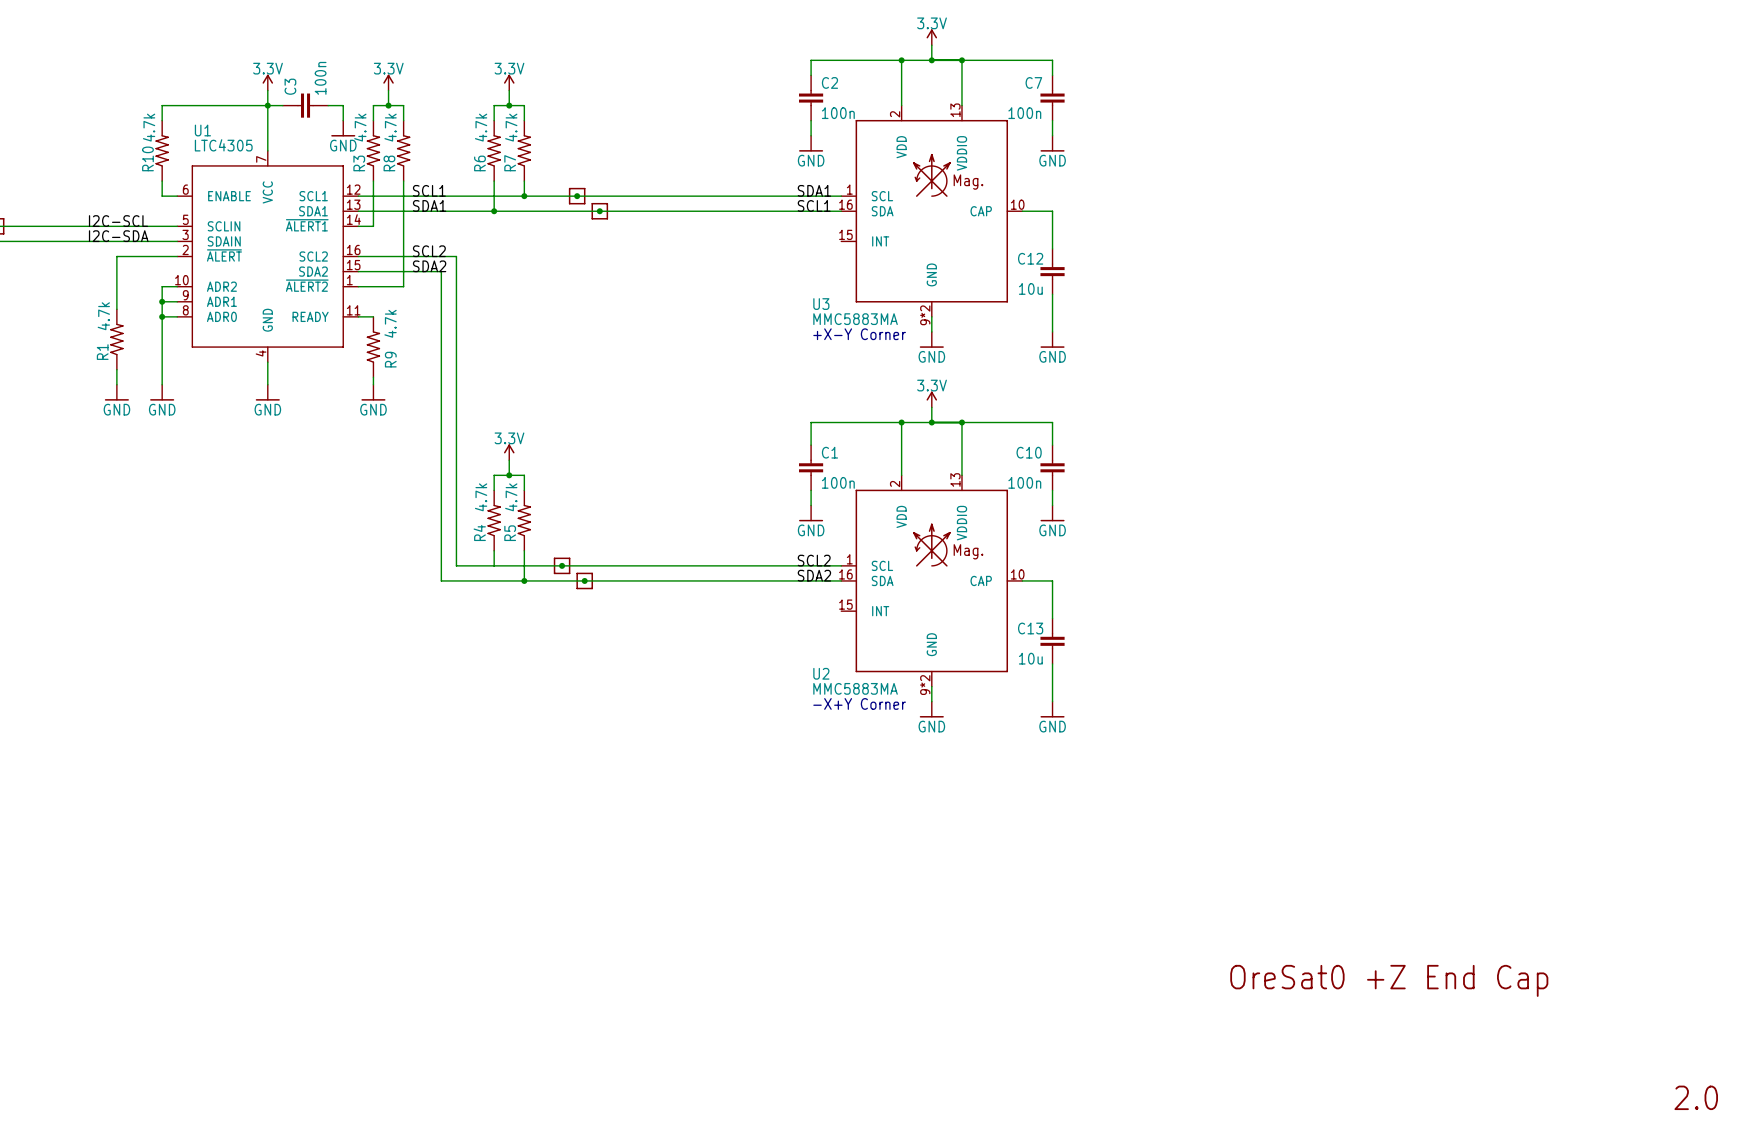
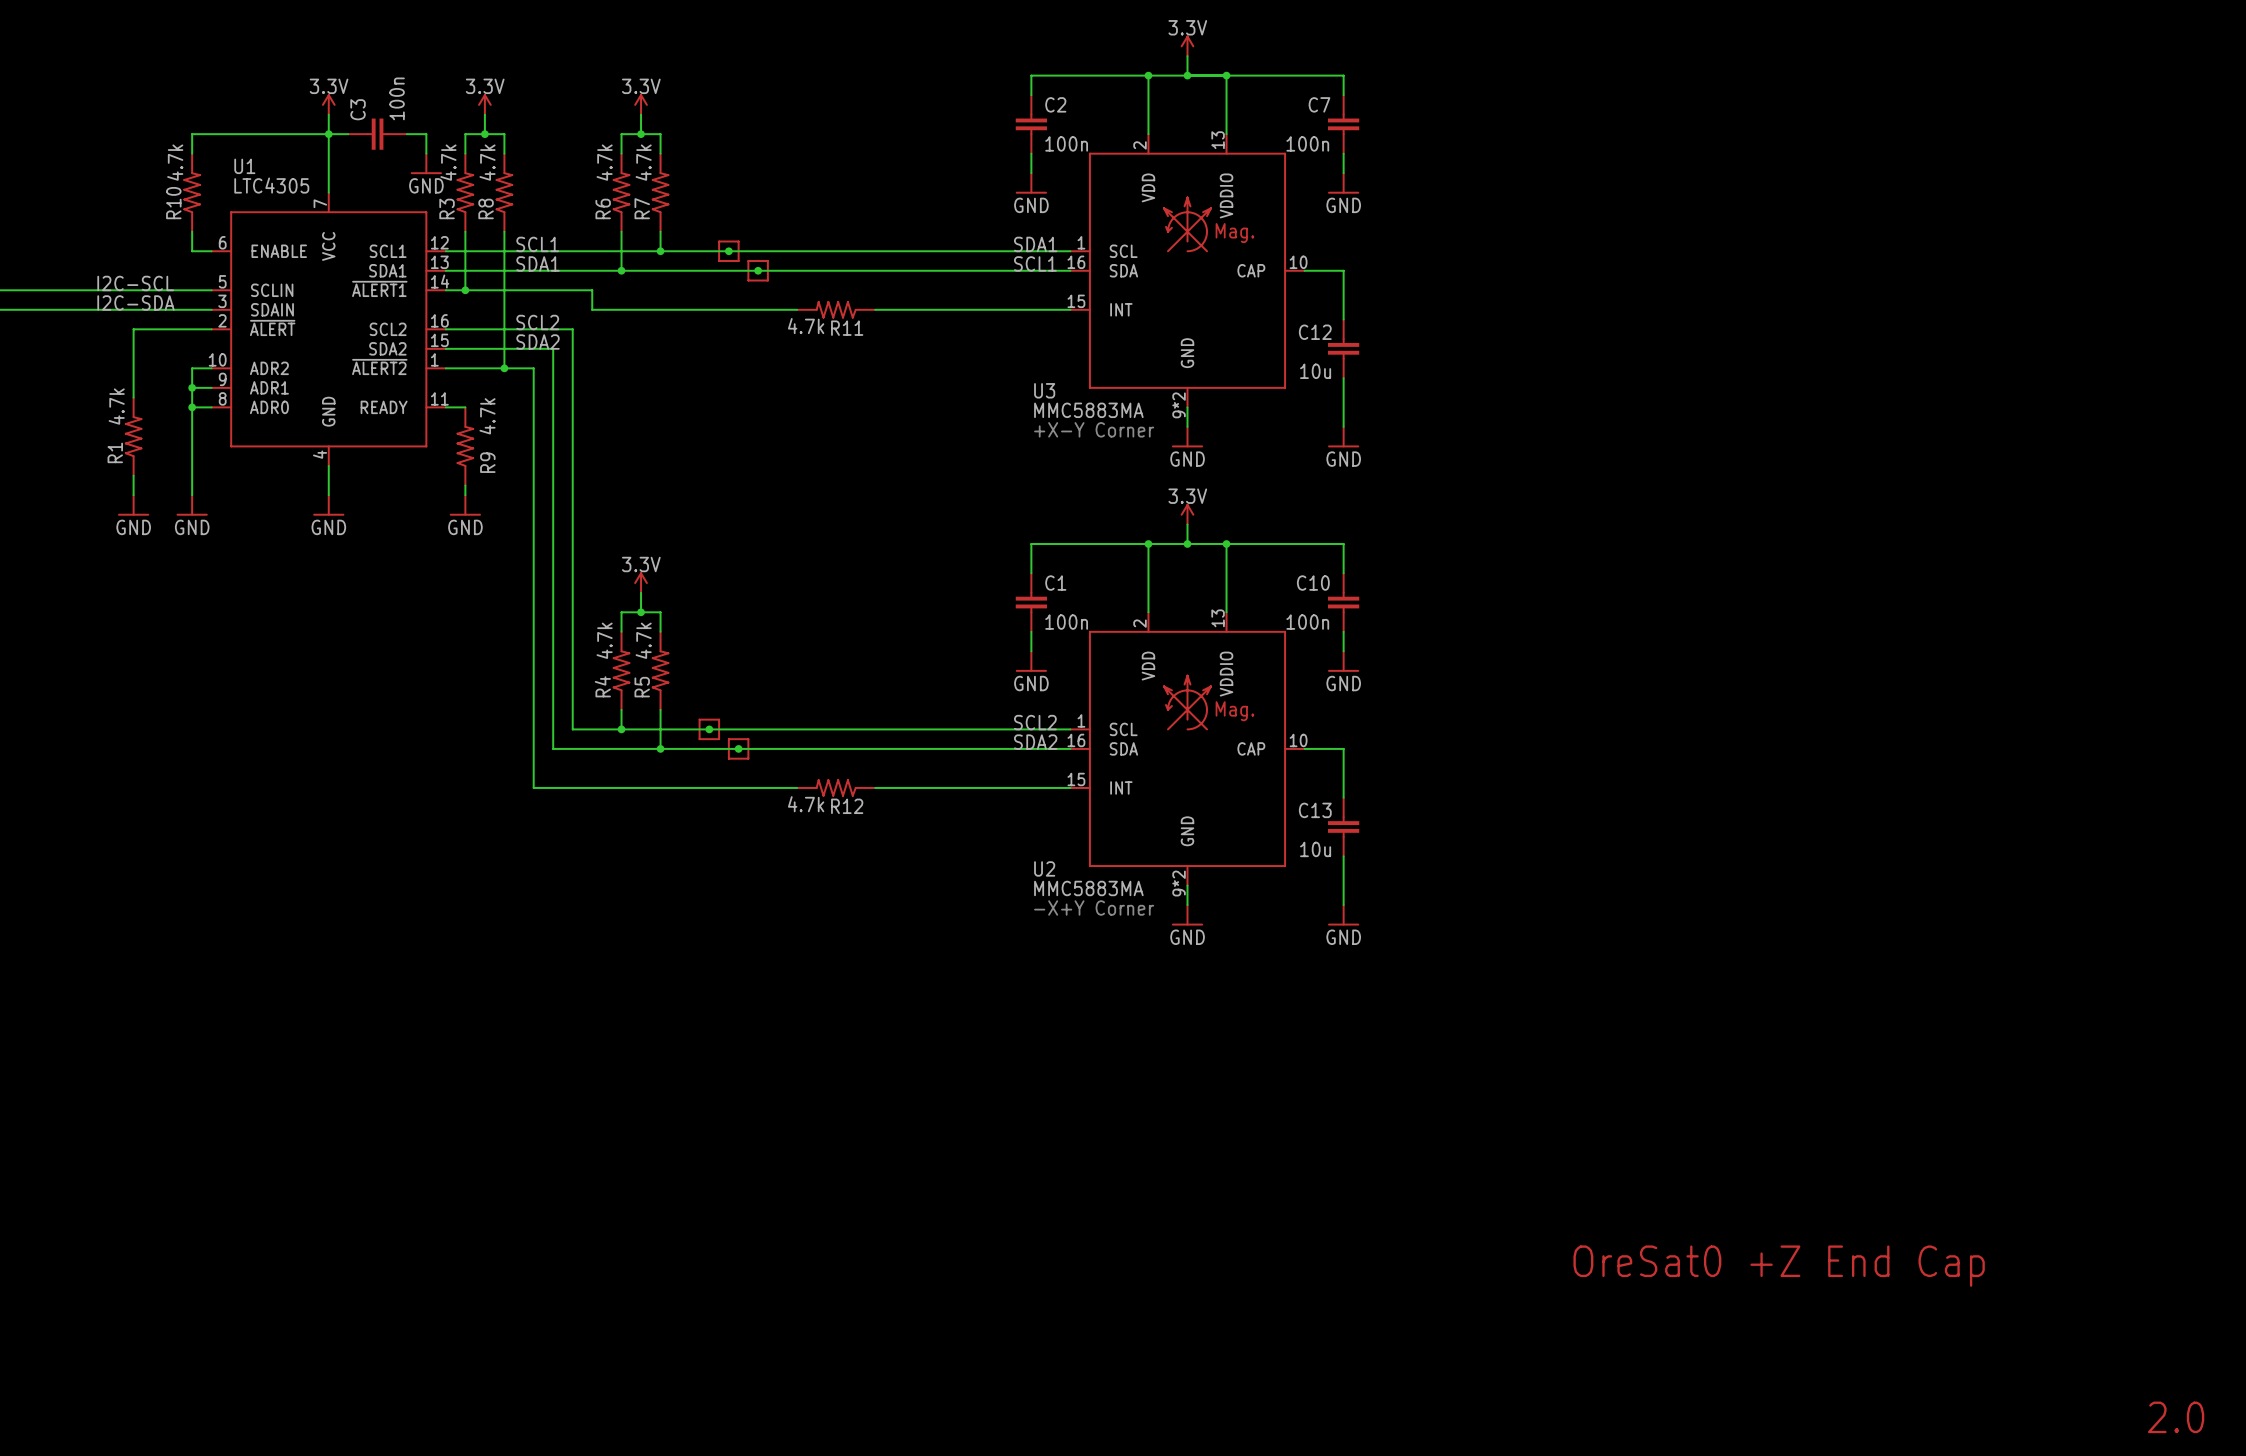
wire: none -> (465, 290) (592, 290) (592, 309) (797, 309)
junction: none -> (465, 290)
R11: none -> 4.7k (836, 309)
wire: none -> (875, 309) (1070, 309)
wire: none -> (504, 368) (533, 368) (533, 787) (797, 787)
junction: none -> (504, 368)
junction: none -> (621, 729)
R12: none -> 4.7k (836, 787)
wire: none -> (875, 787) (1070, 787)

